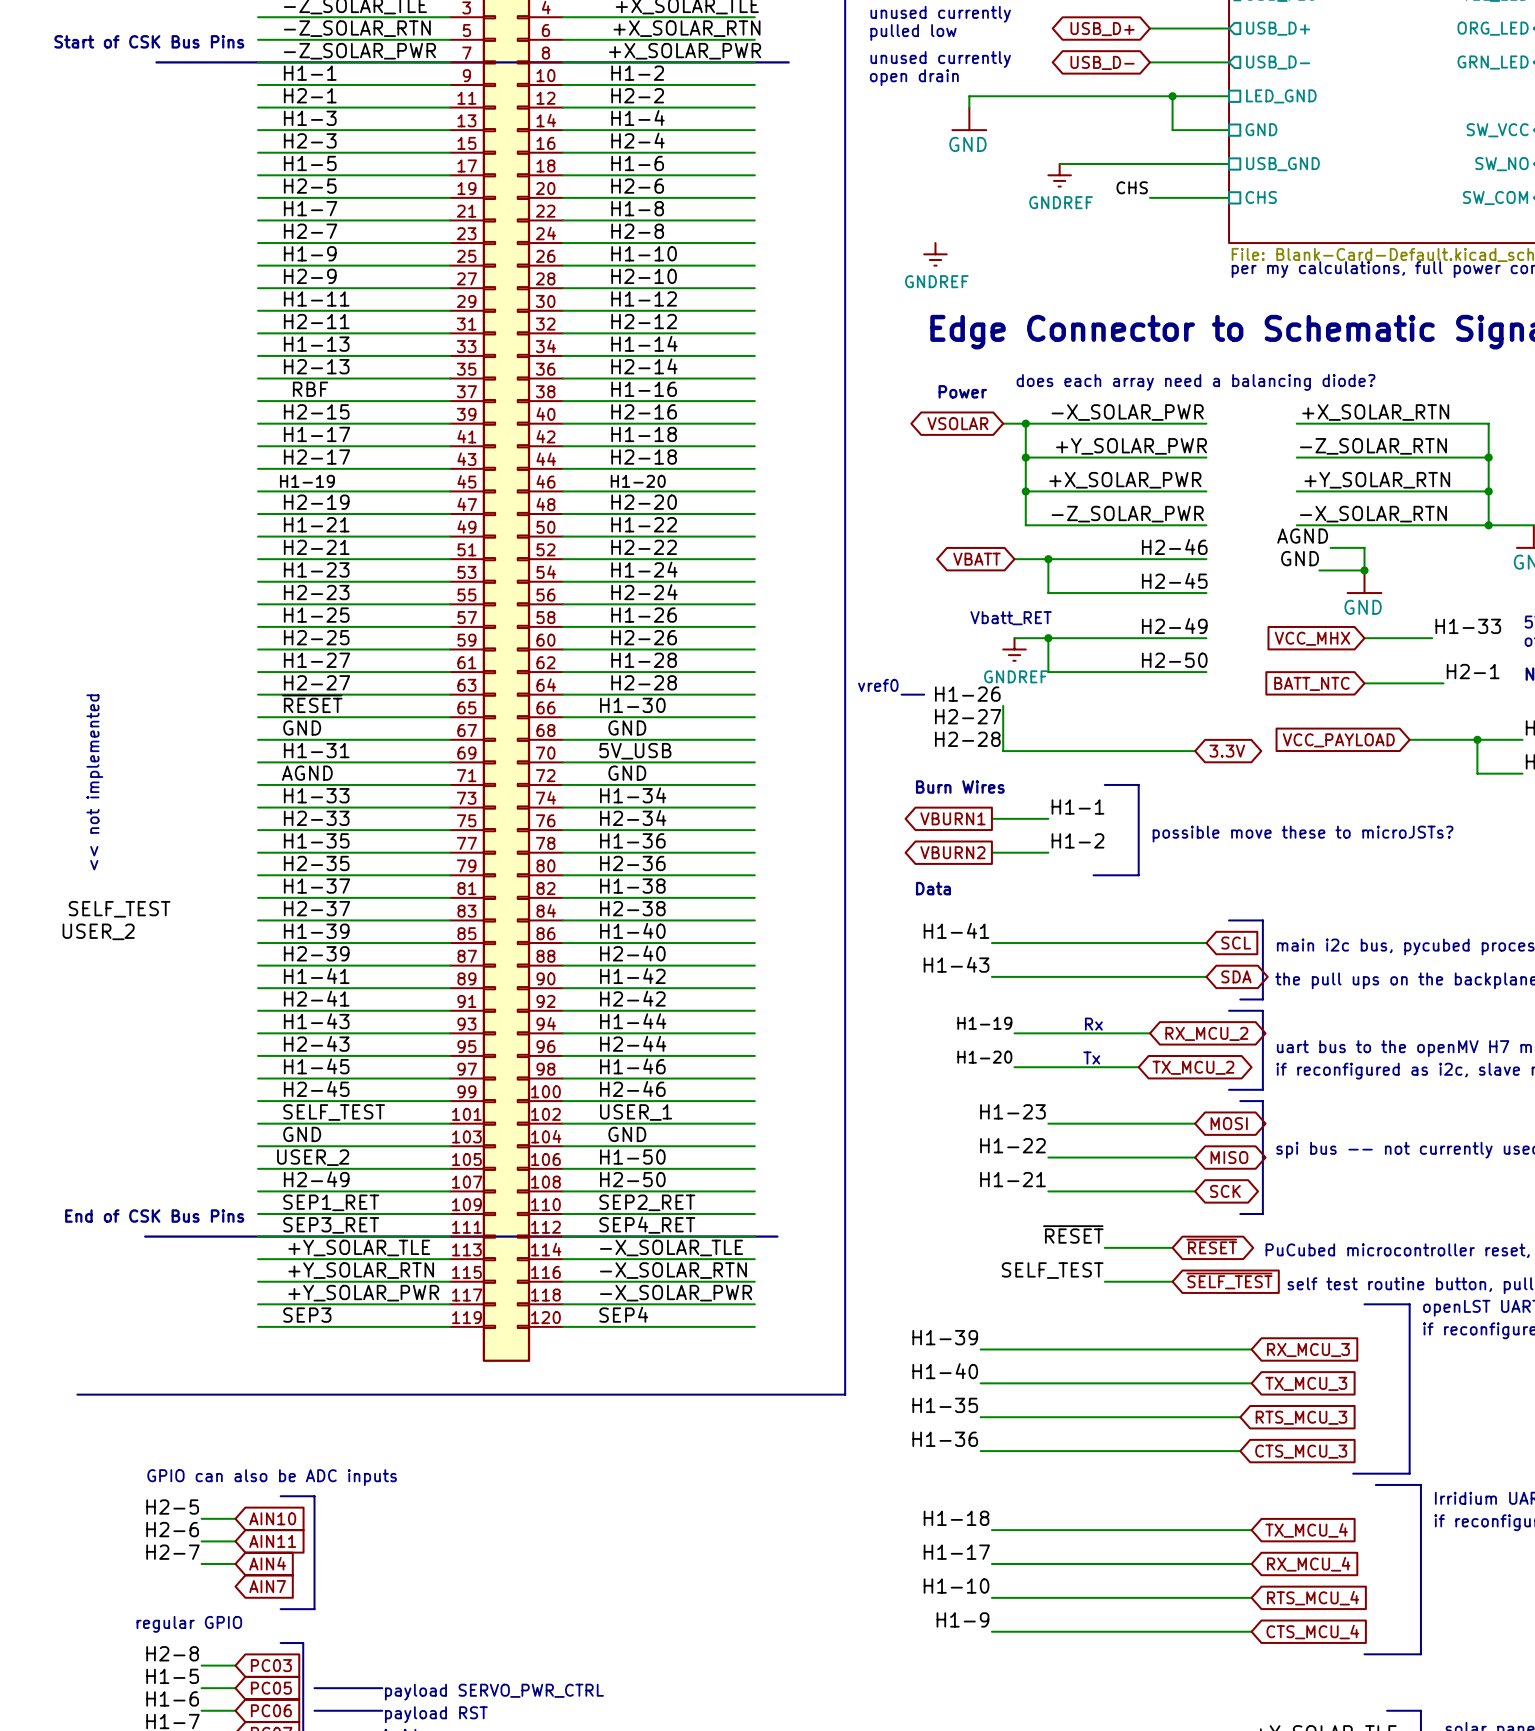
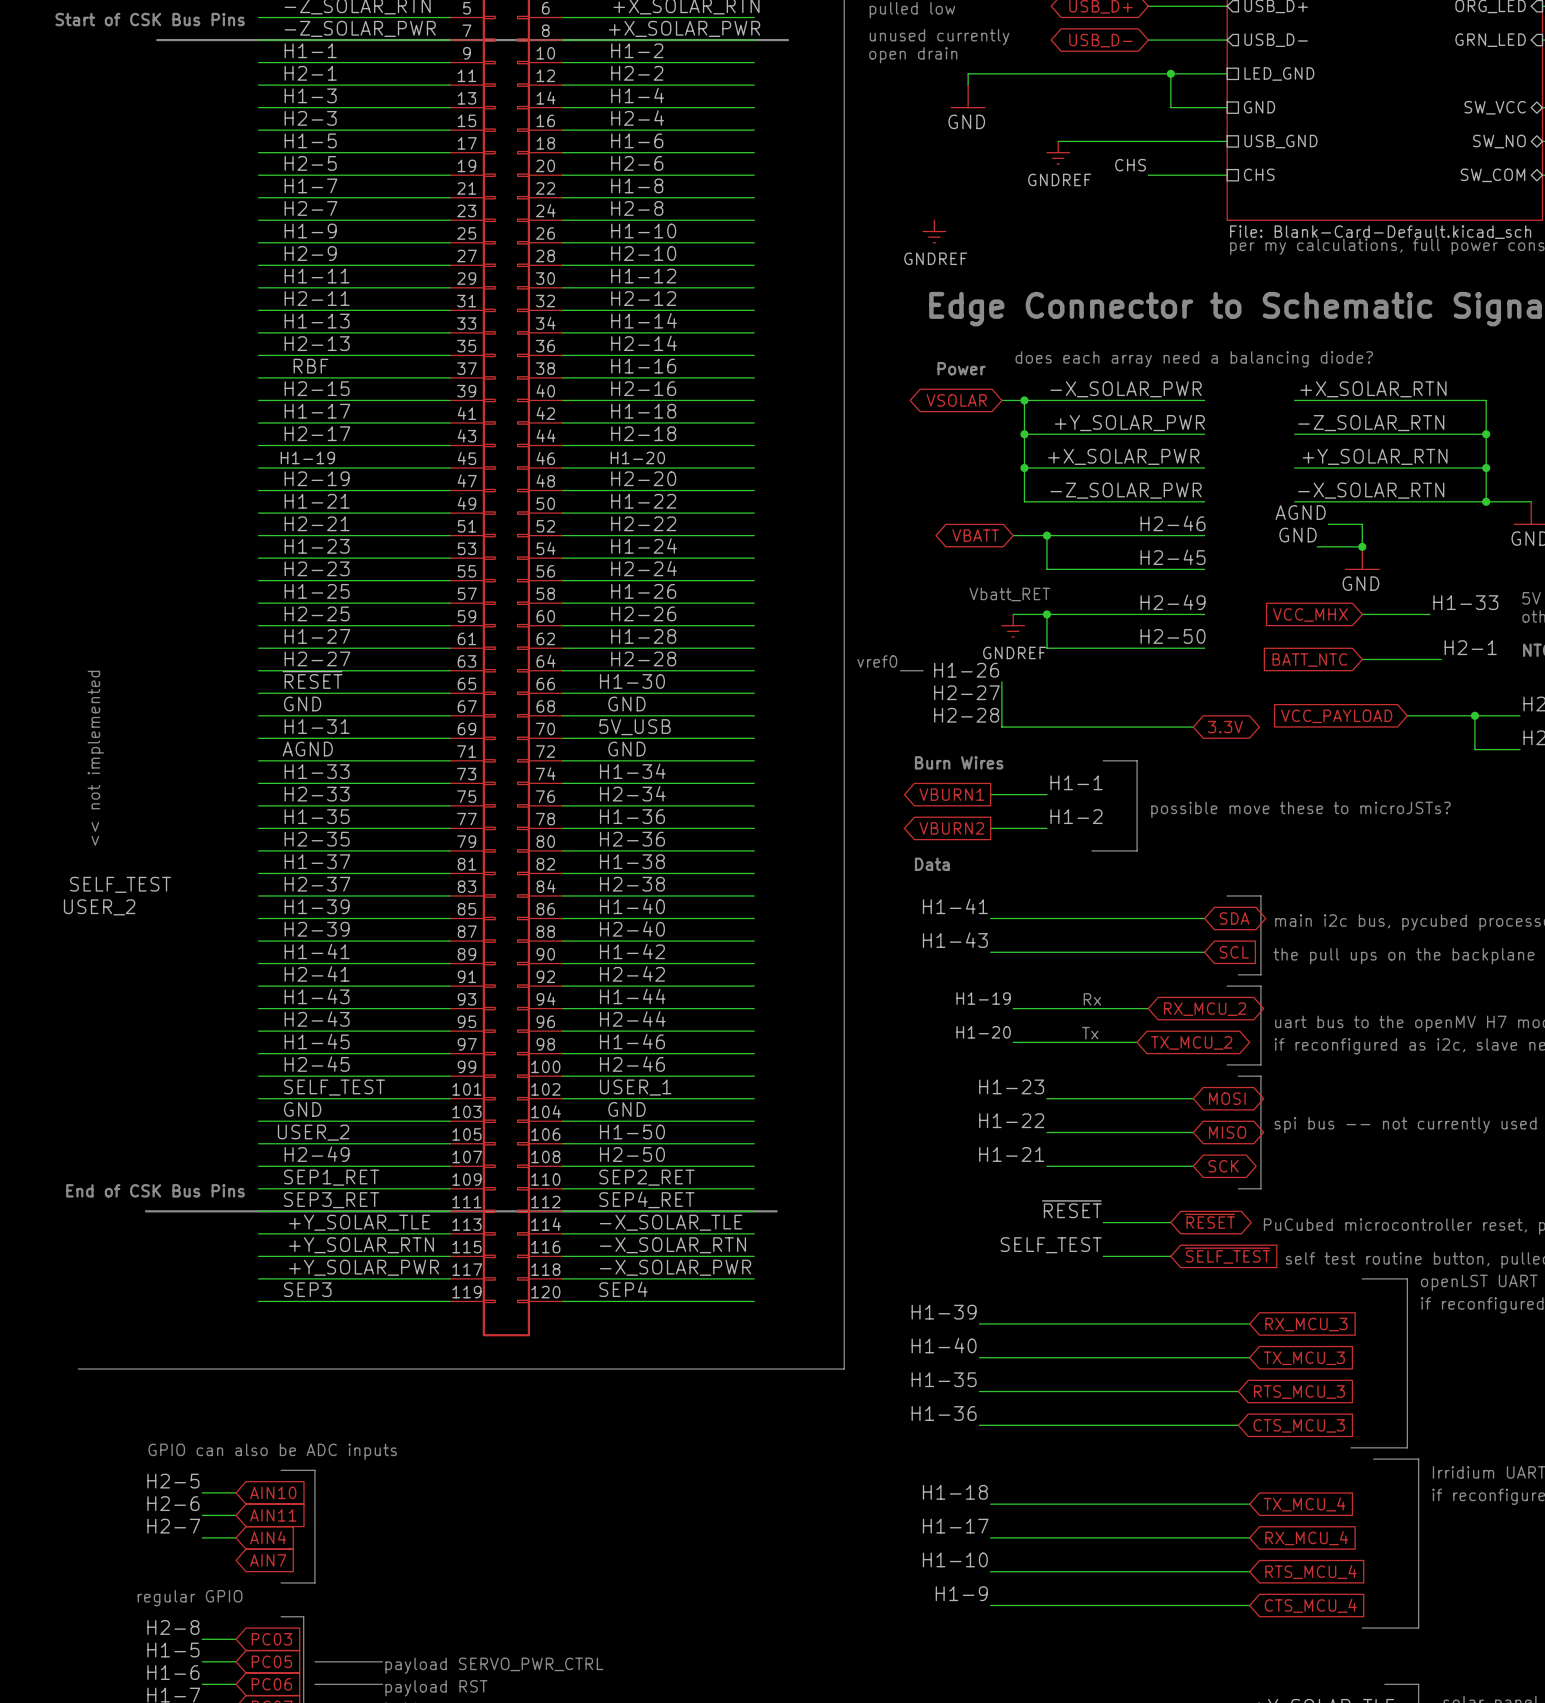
global label shape: input (1236, 943) -> bidirectional (1234, 918)
global label: SCL (1236, 943) -> SDA (1234, 918)
global label shape: bidirectional (1236, 976) -> input (1234, 952)
global label: SDA (1236, 976) -> SCL (1234, 952)

